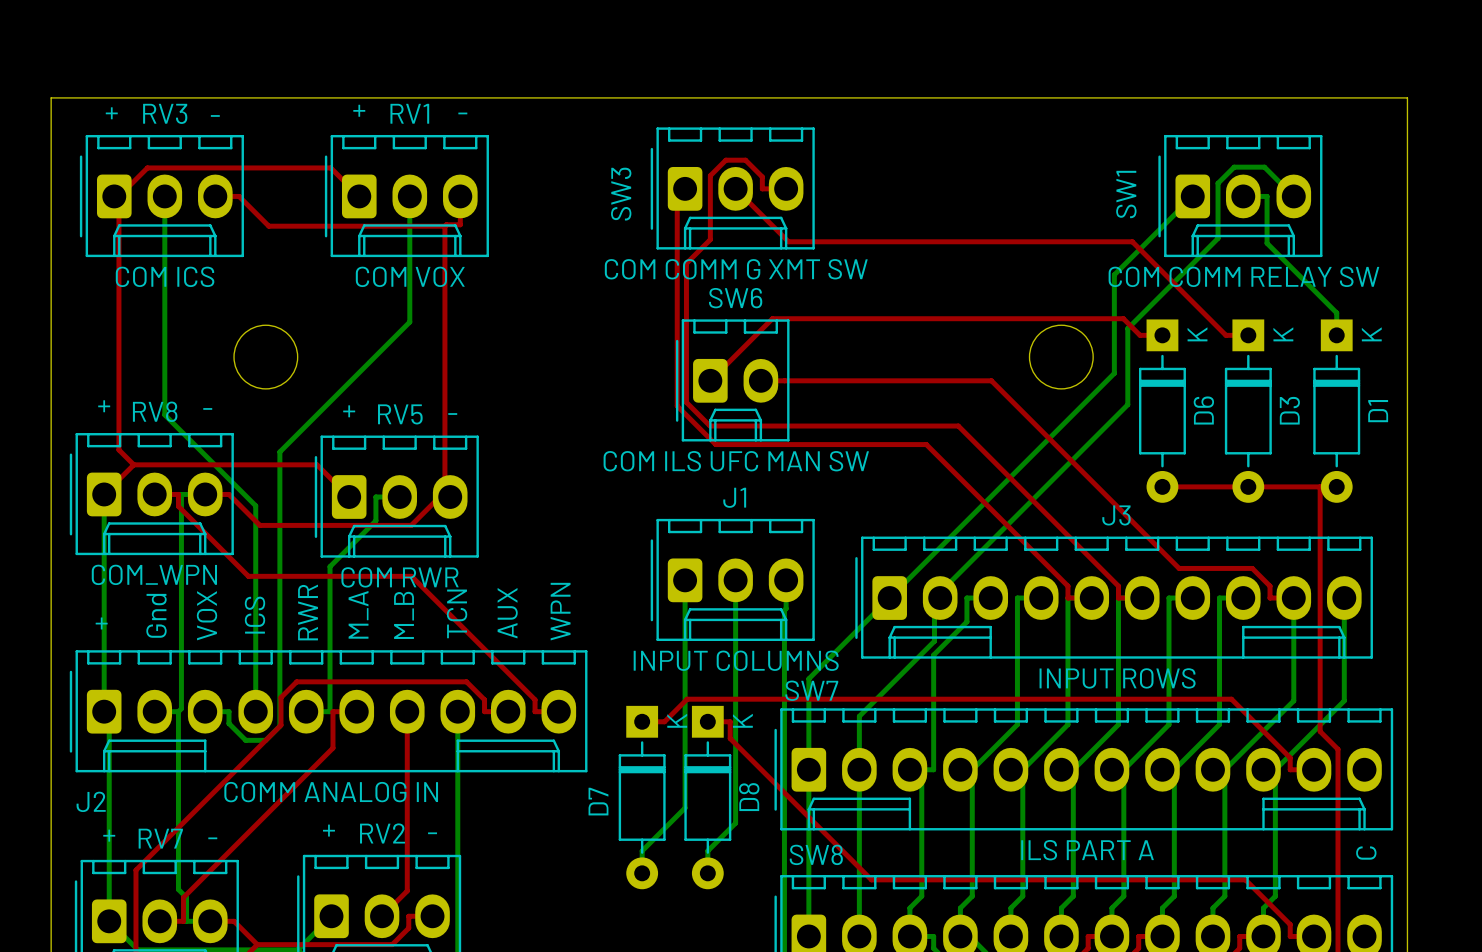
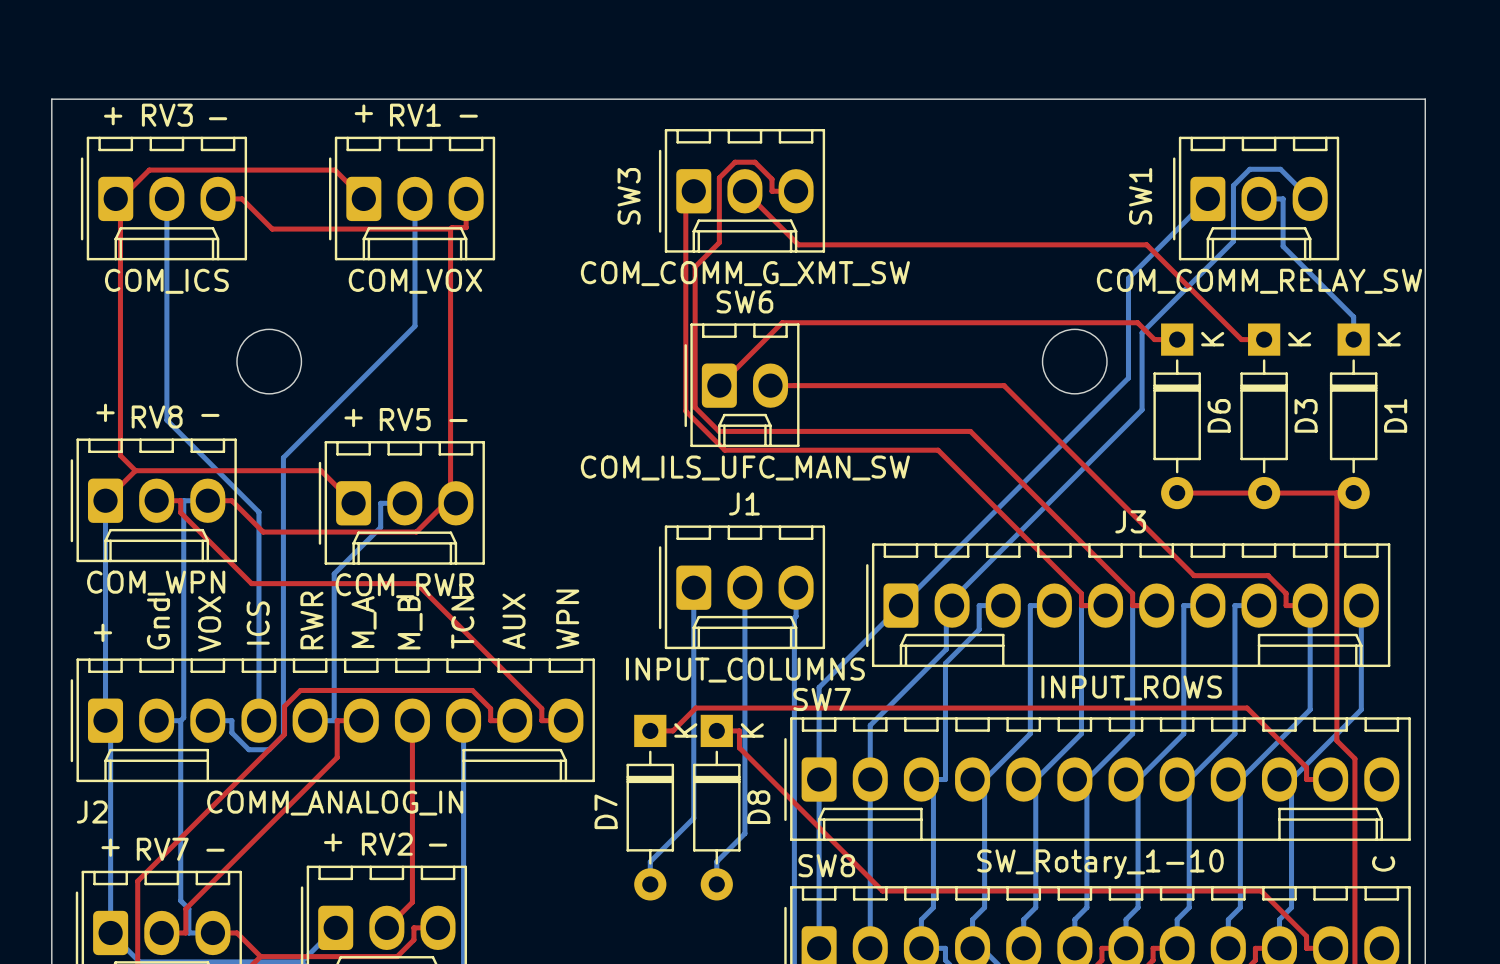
SW3 value: COM COMM G XMT SW (736, 269) -> COM_COMM_G_XMT_SW (745, 273)
RV3 value: COM ICS (165, 276) -> COM_ICS (166, 281)
RV1 value: COM VOX (410, 276) -> COM_VOX (415, 281)
SW1 value: COM COMM RELAY SW (1243, 276) -> COM_COMM_RELAY_SW (1259, 281)
SW6 value: COM ILS UFC MAN SW (736, 461) -> COM_ILS_UFC_MAN_SW (745, 468)
RV5 value: COM RWR (400, 577) -> COM_RWR (404, 585)
J1 value: INPUT COLUMNS (736, 660) -> INPUT_COLUMNS (745, 670)
J3 value: INPUT ROWS (1117, 678) -> INPUT_ROWS (1131, 687)
J2 value: COMM ANALOG IN (331, 792) -> COMM_ANALOG_IN (335, 803)
SW7 value: ILS PART A (1087, 850) -> SW_Rotary_1-10 (1100, 864)

